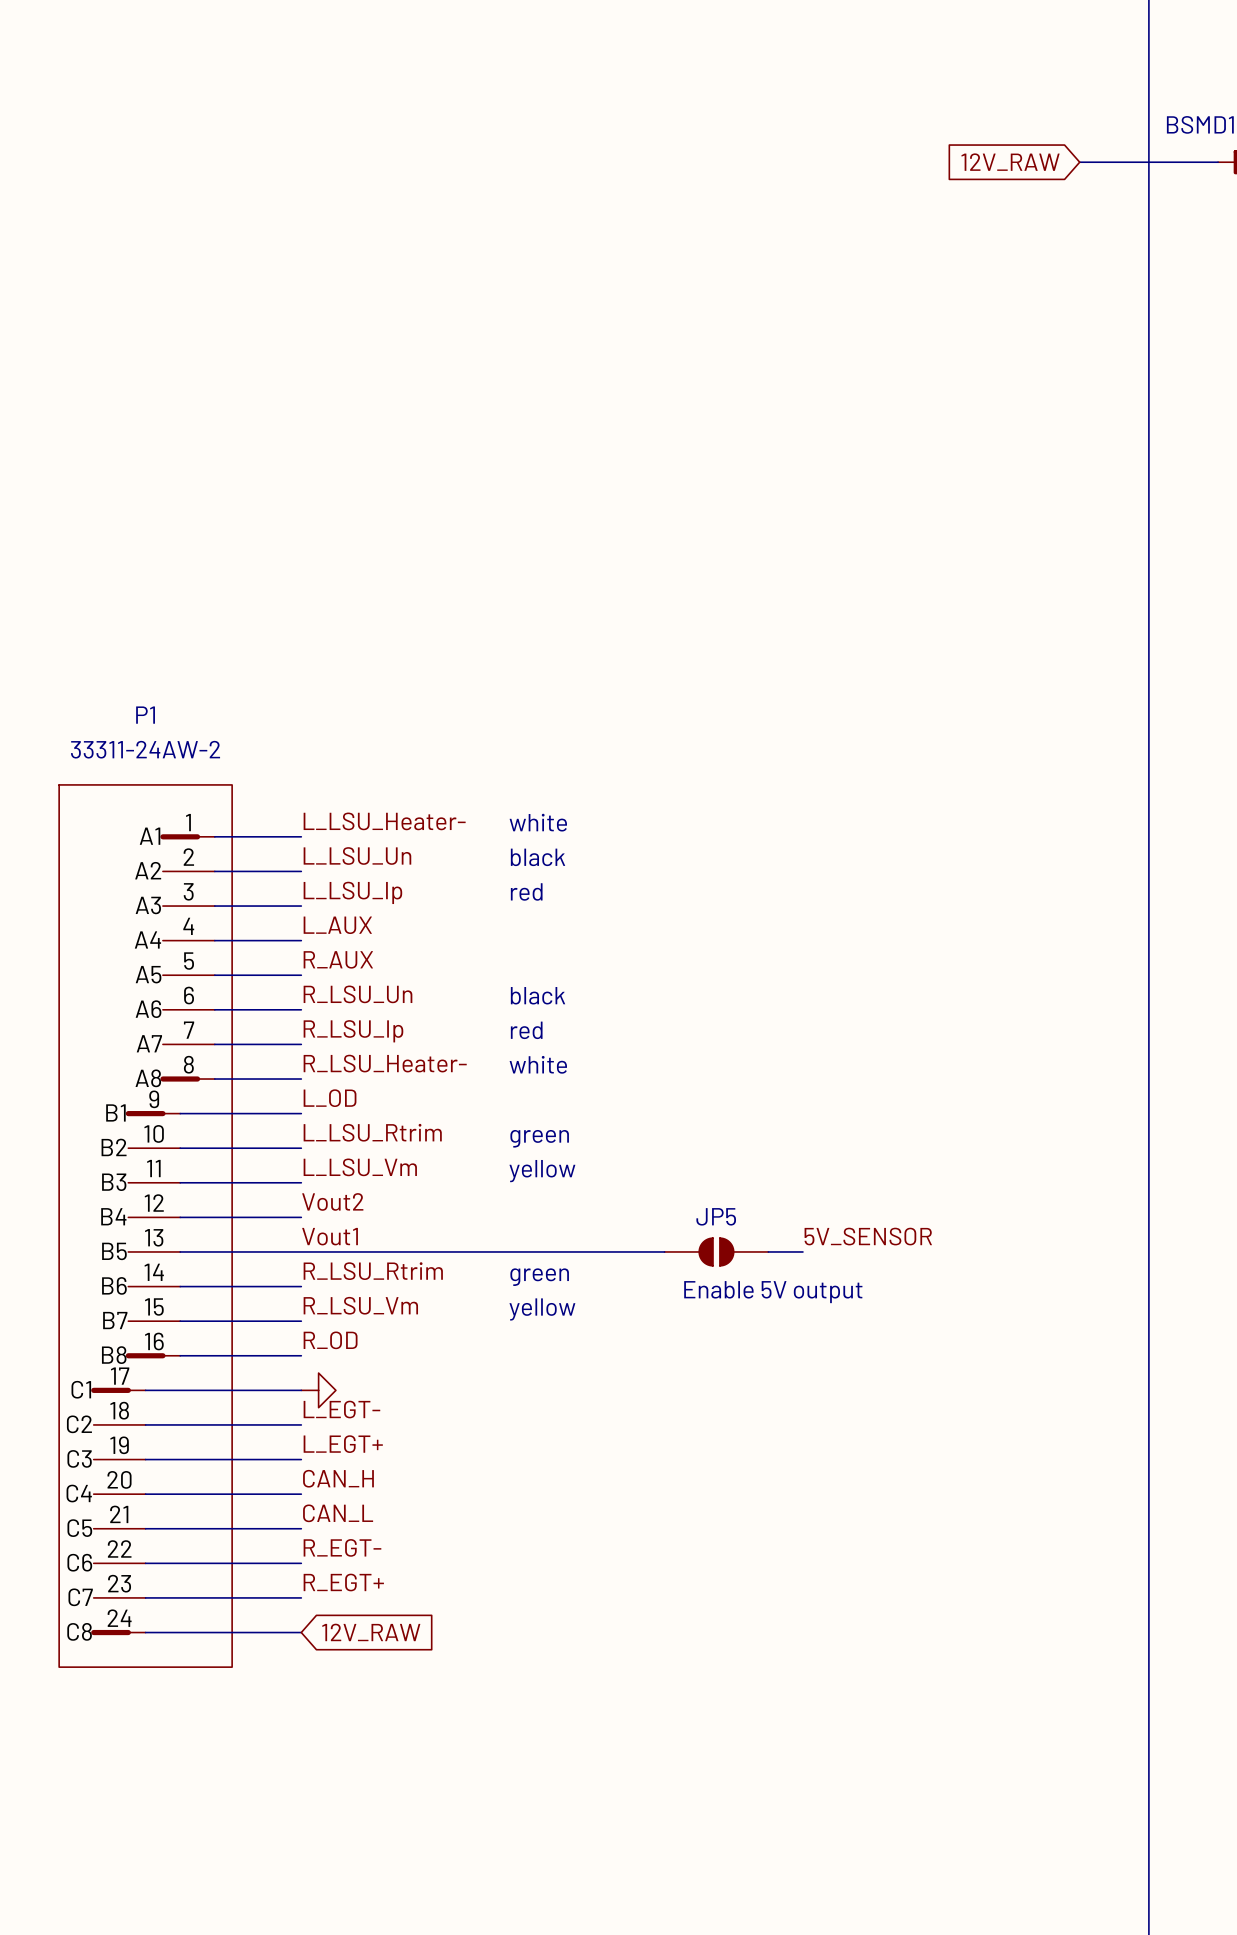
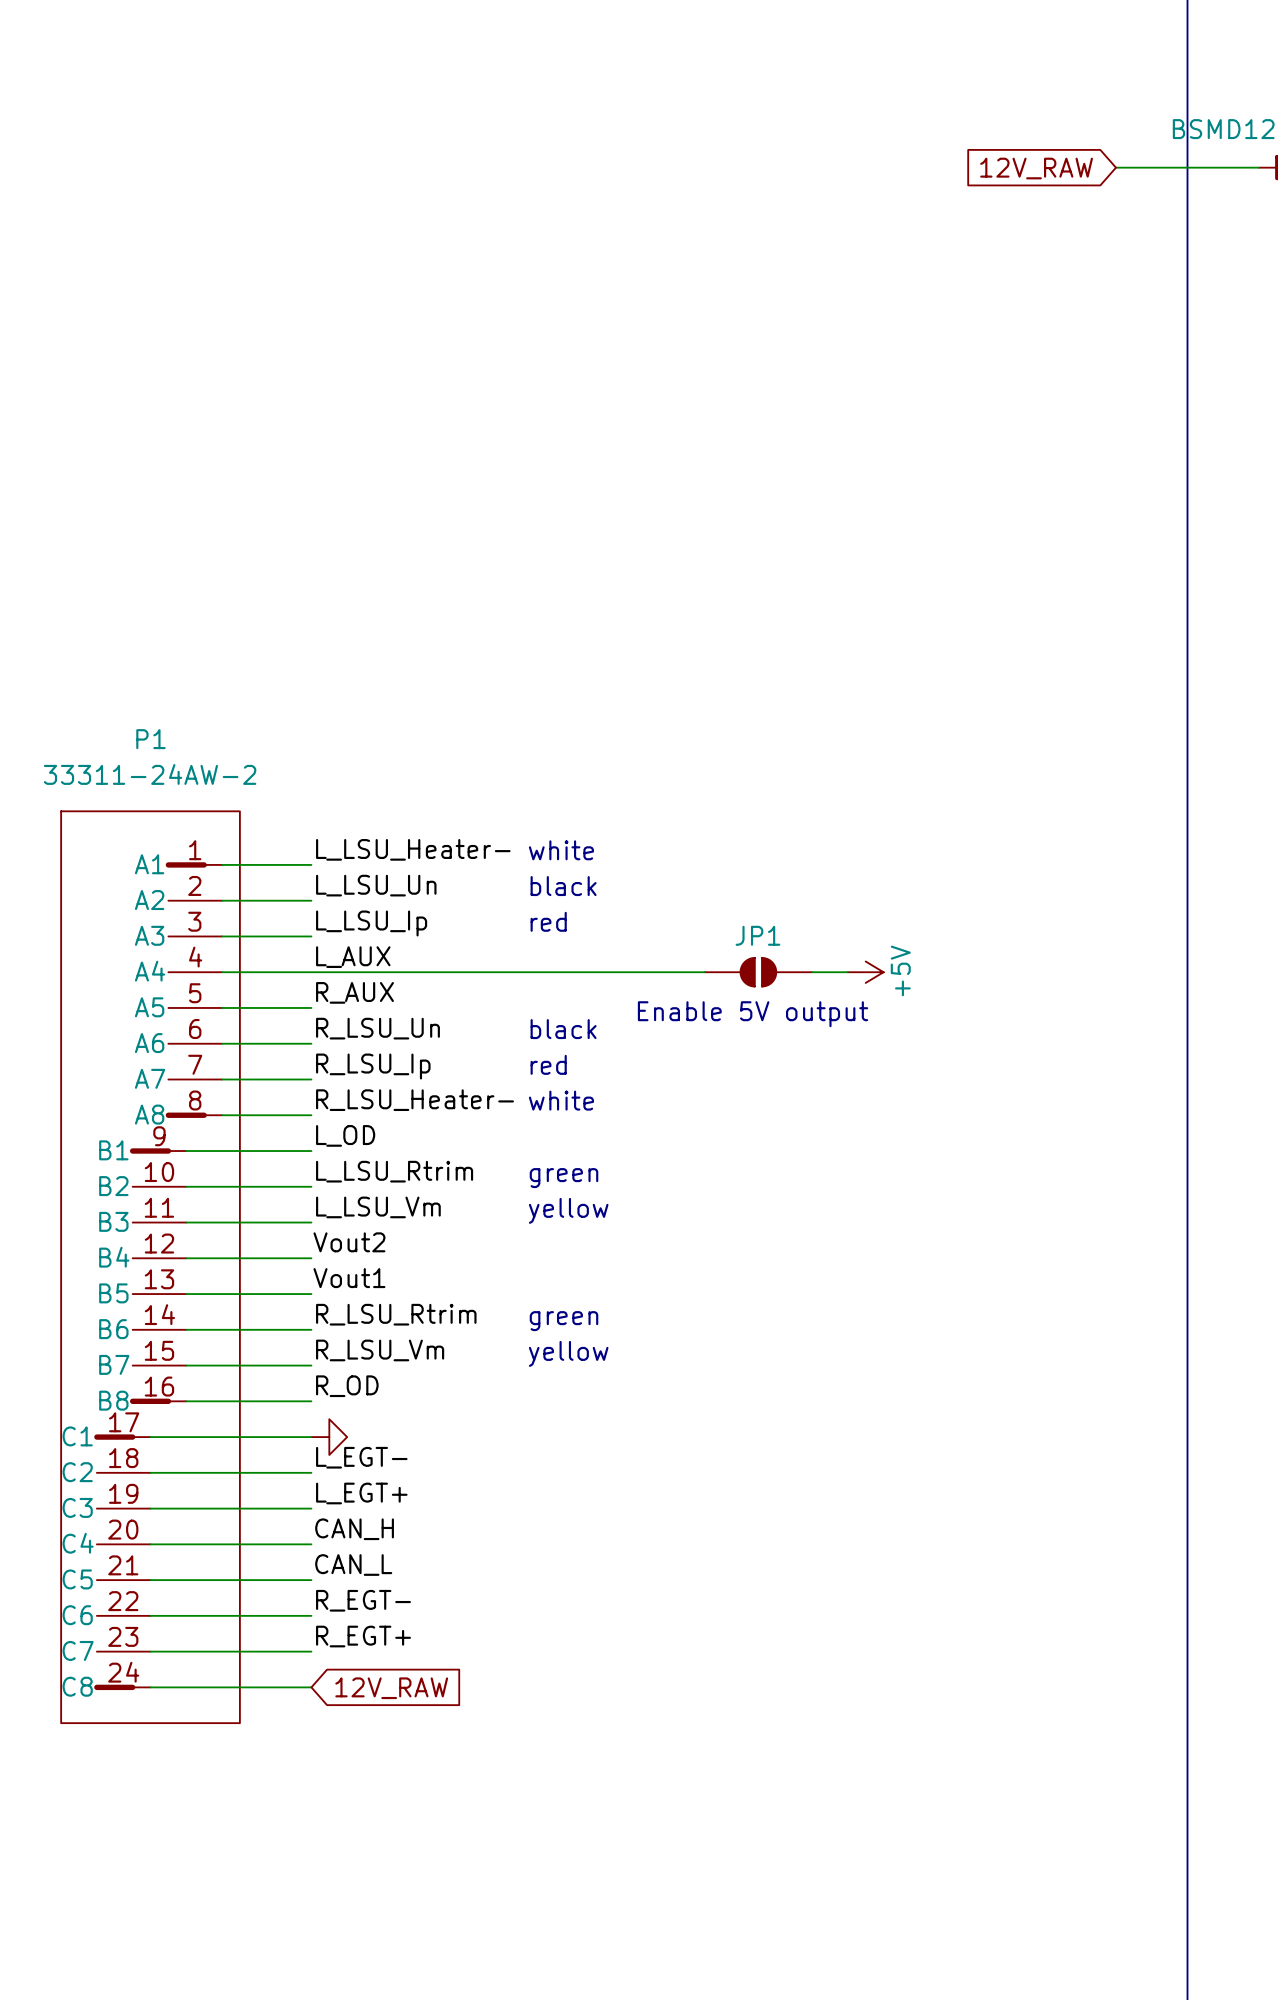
wire: none -> (311, 972) (704, 972)
JP1: none -> (758, 972)
power symbol: none -> +5V (865, 972)
label: 5V_SENSOR (868, 1236) -> none
wire: (301, 1251) (664, 1251) -> none
JP5: (716, 1251) -> none
wire: (768, 1251) (802, 1251) -> (812, 972) (847, 972)
text position: Enable 5V output (773, 1292) -> Enable 5V output (753, 1014)

